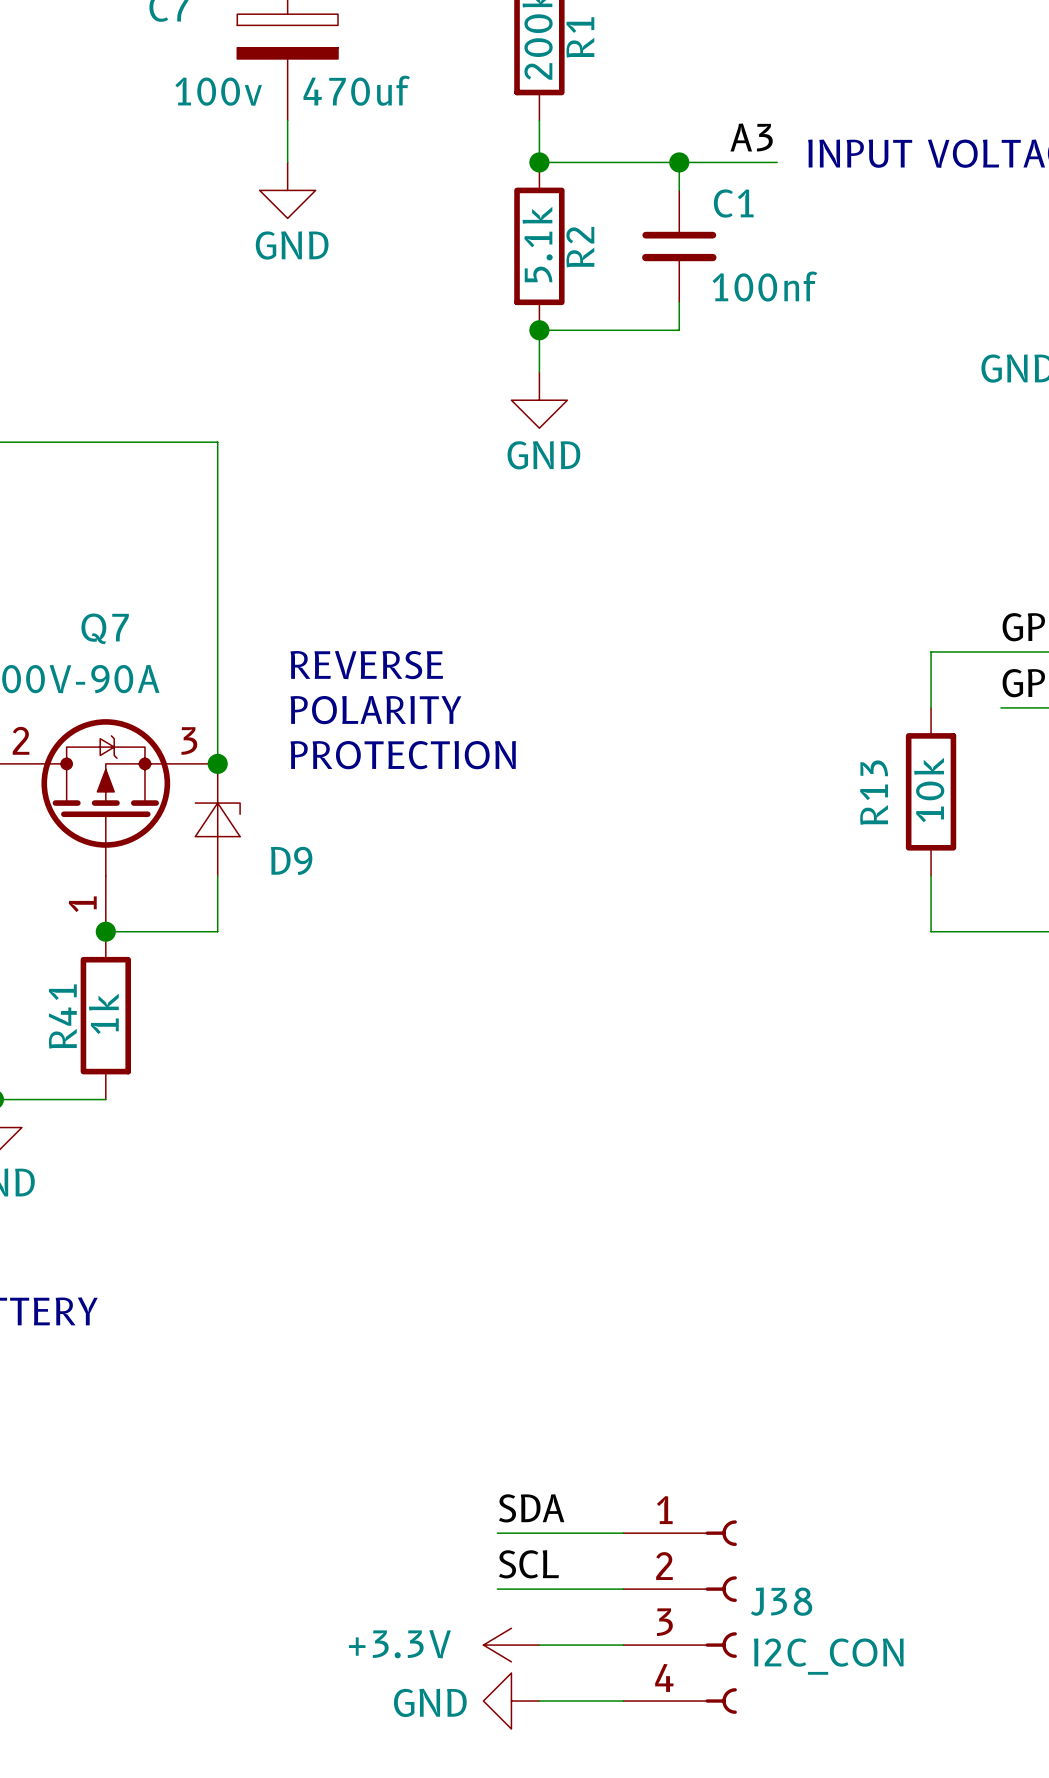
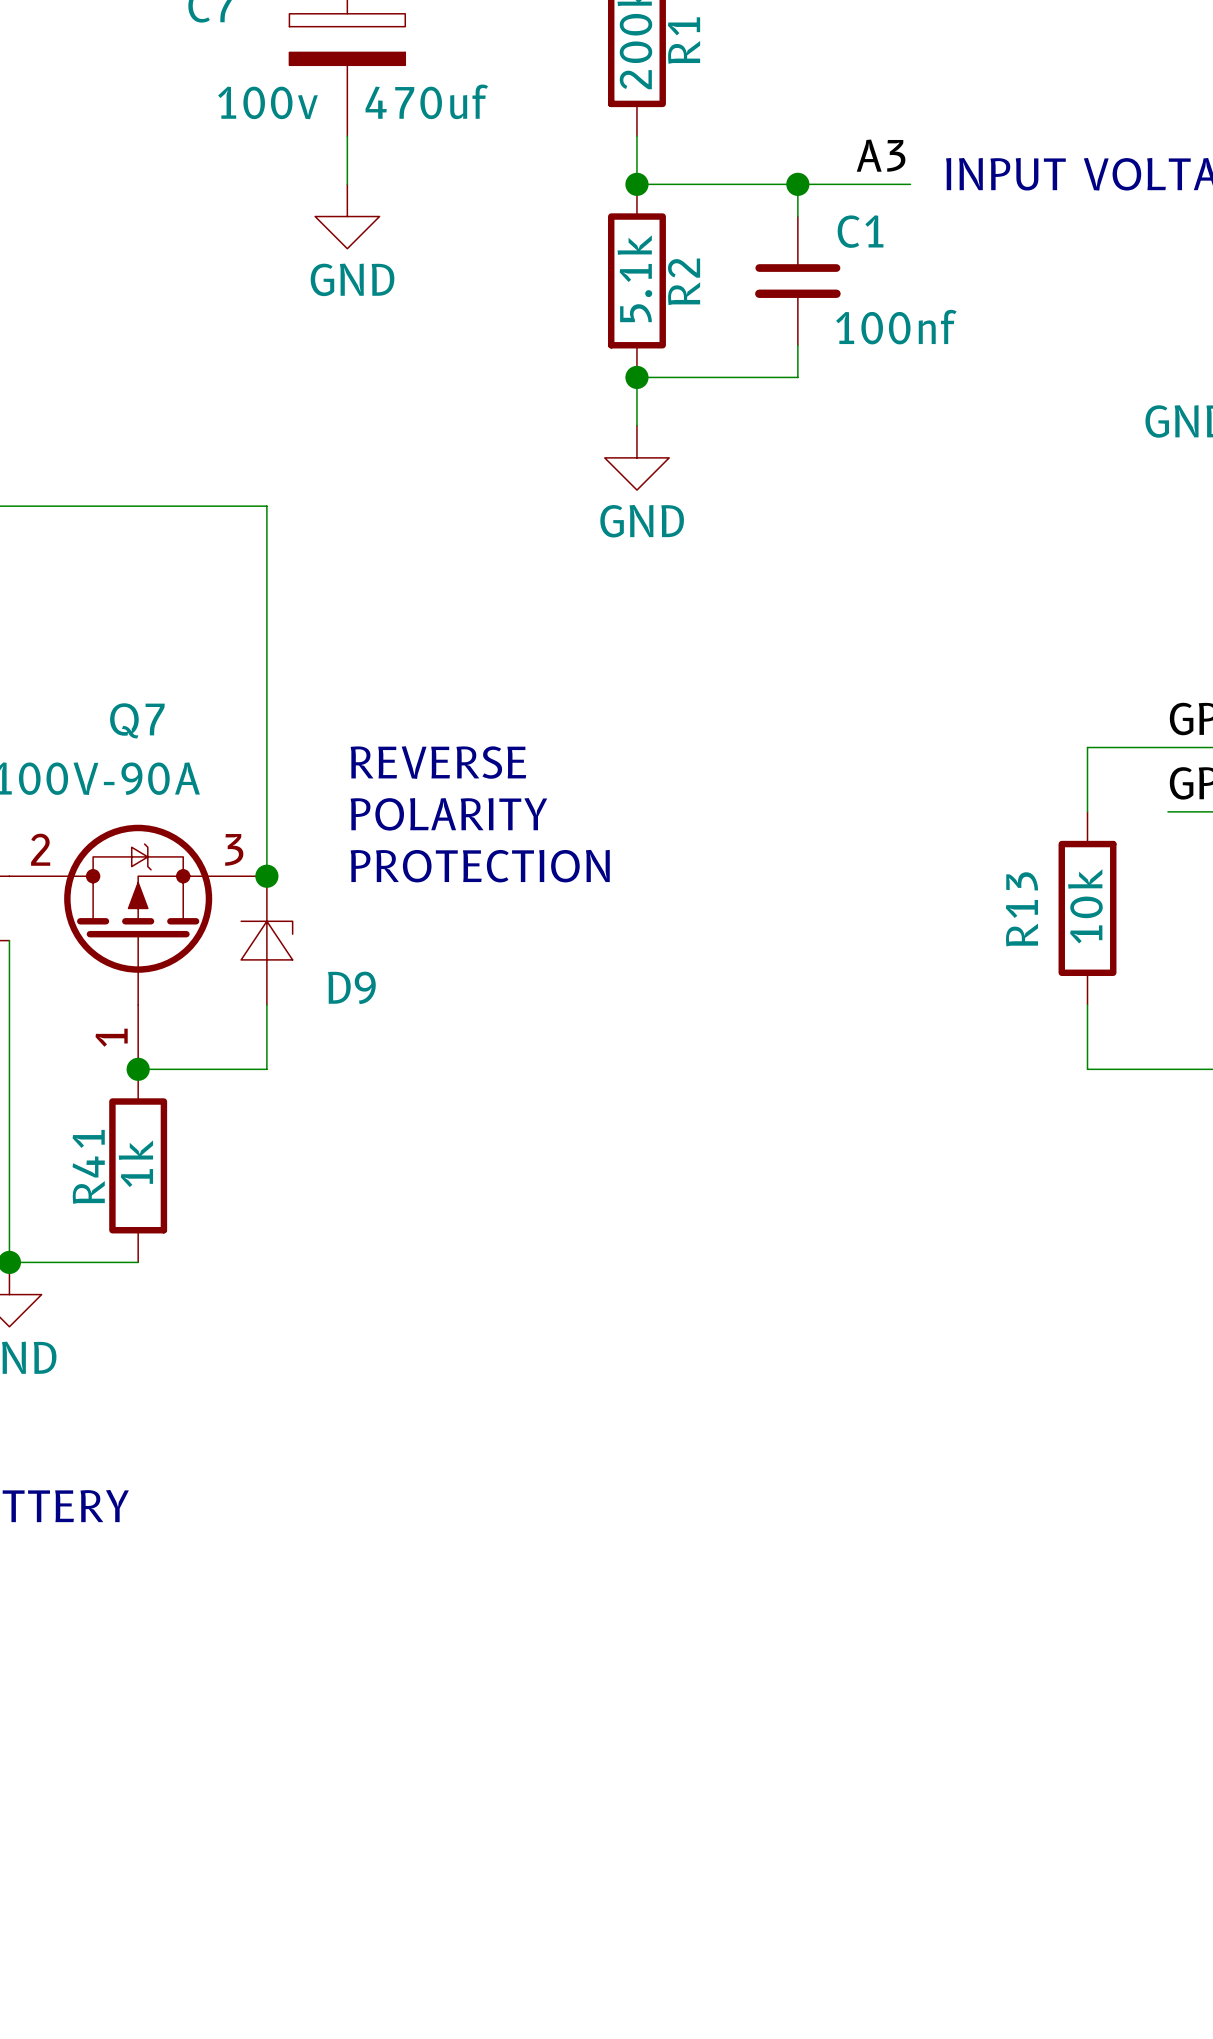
label: SDA (531, 1508) -> none
wire: (497, 1533) (623, 1533) -> none
label: SCL (528, 1564) -> none
wire: (497, 1589) (623, 1589) -> none
J38: I2C_CON (680, 1617) -> none
power symbol: +3.3V (511, 1645) -> none
wire: (539, 1645) (623, 1645) -> none
power symbol: GND (511, 1701) -> none
wire: (539, 1701) (623, 1701) -> none

